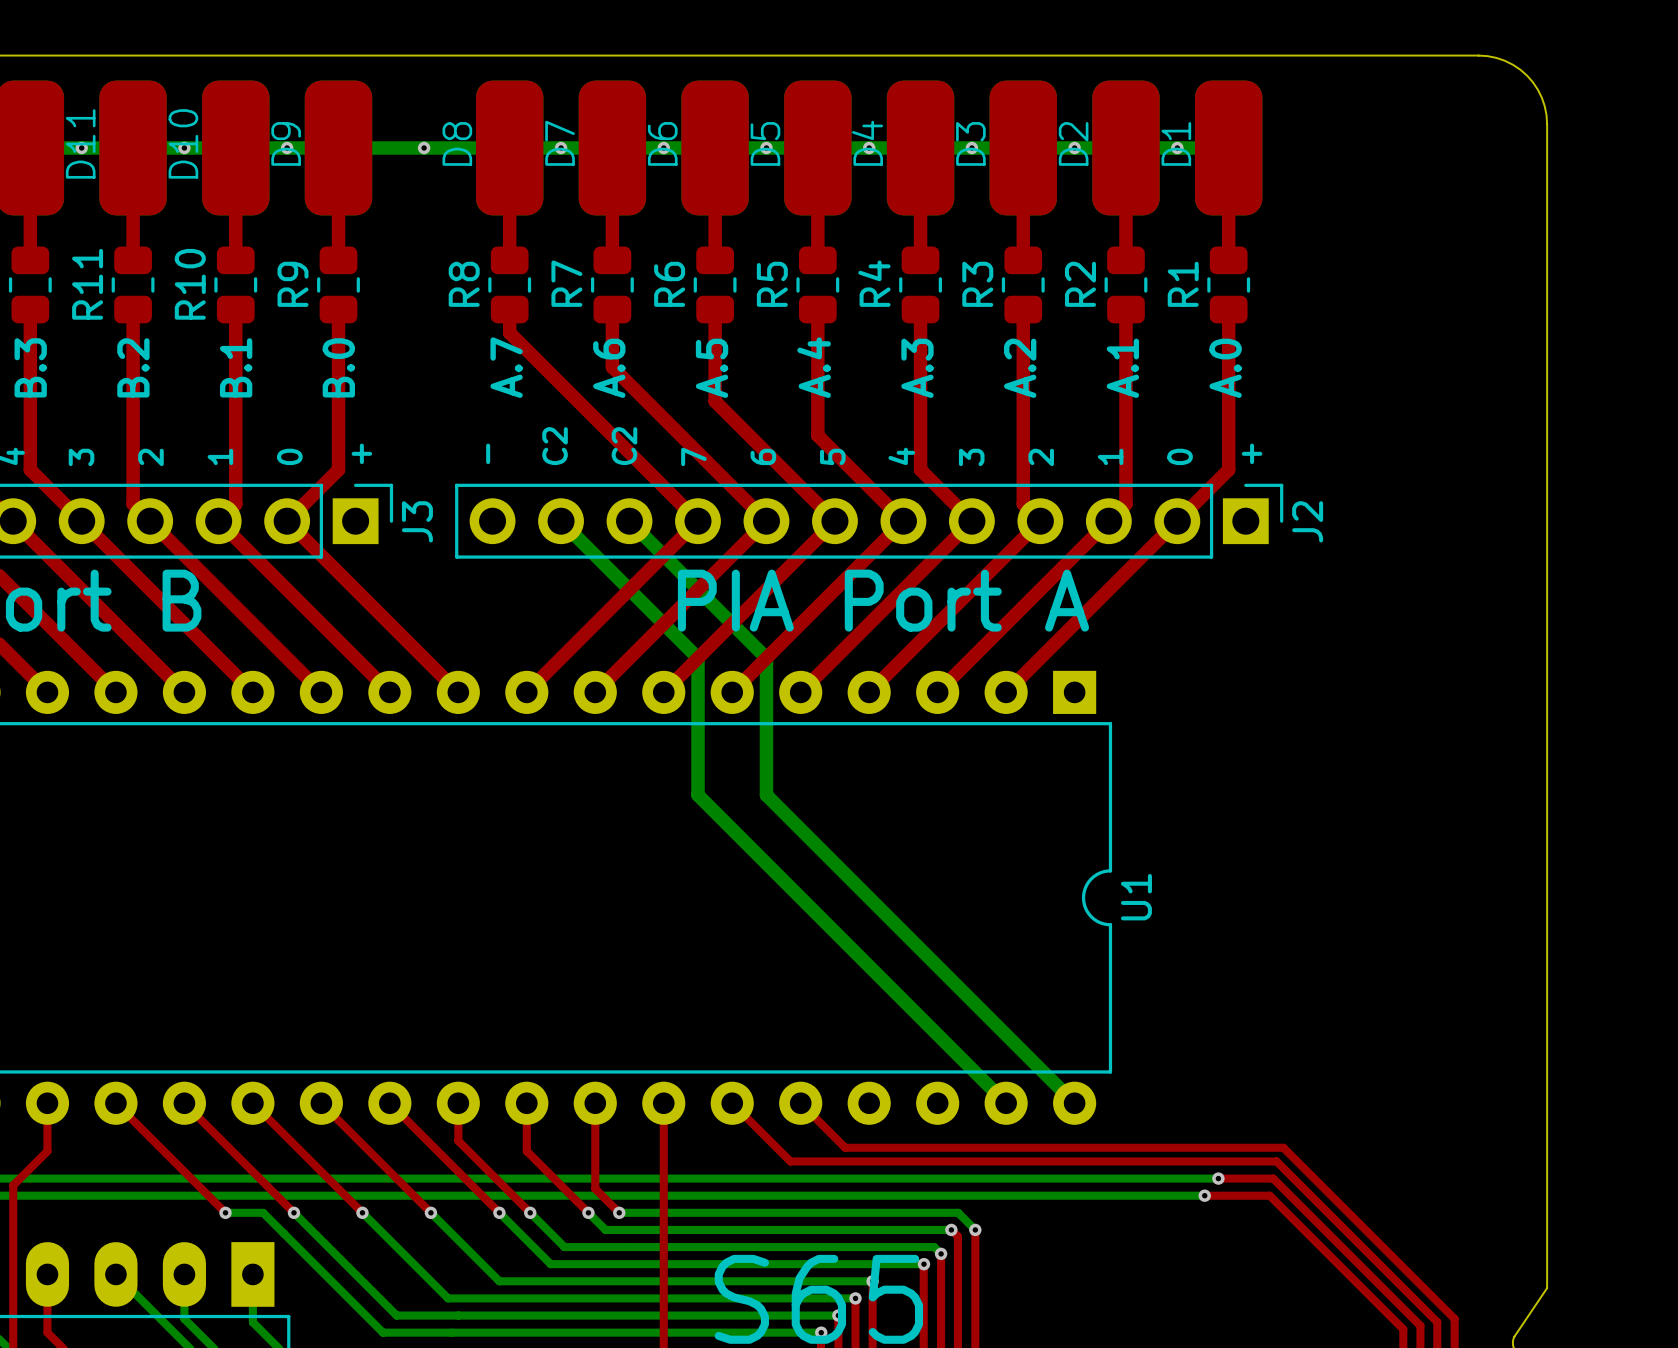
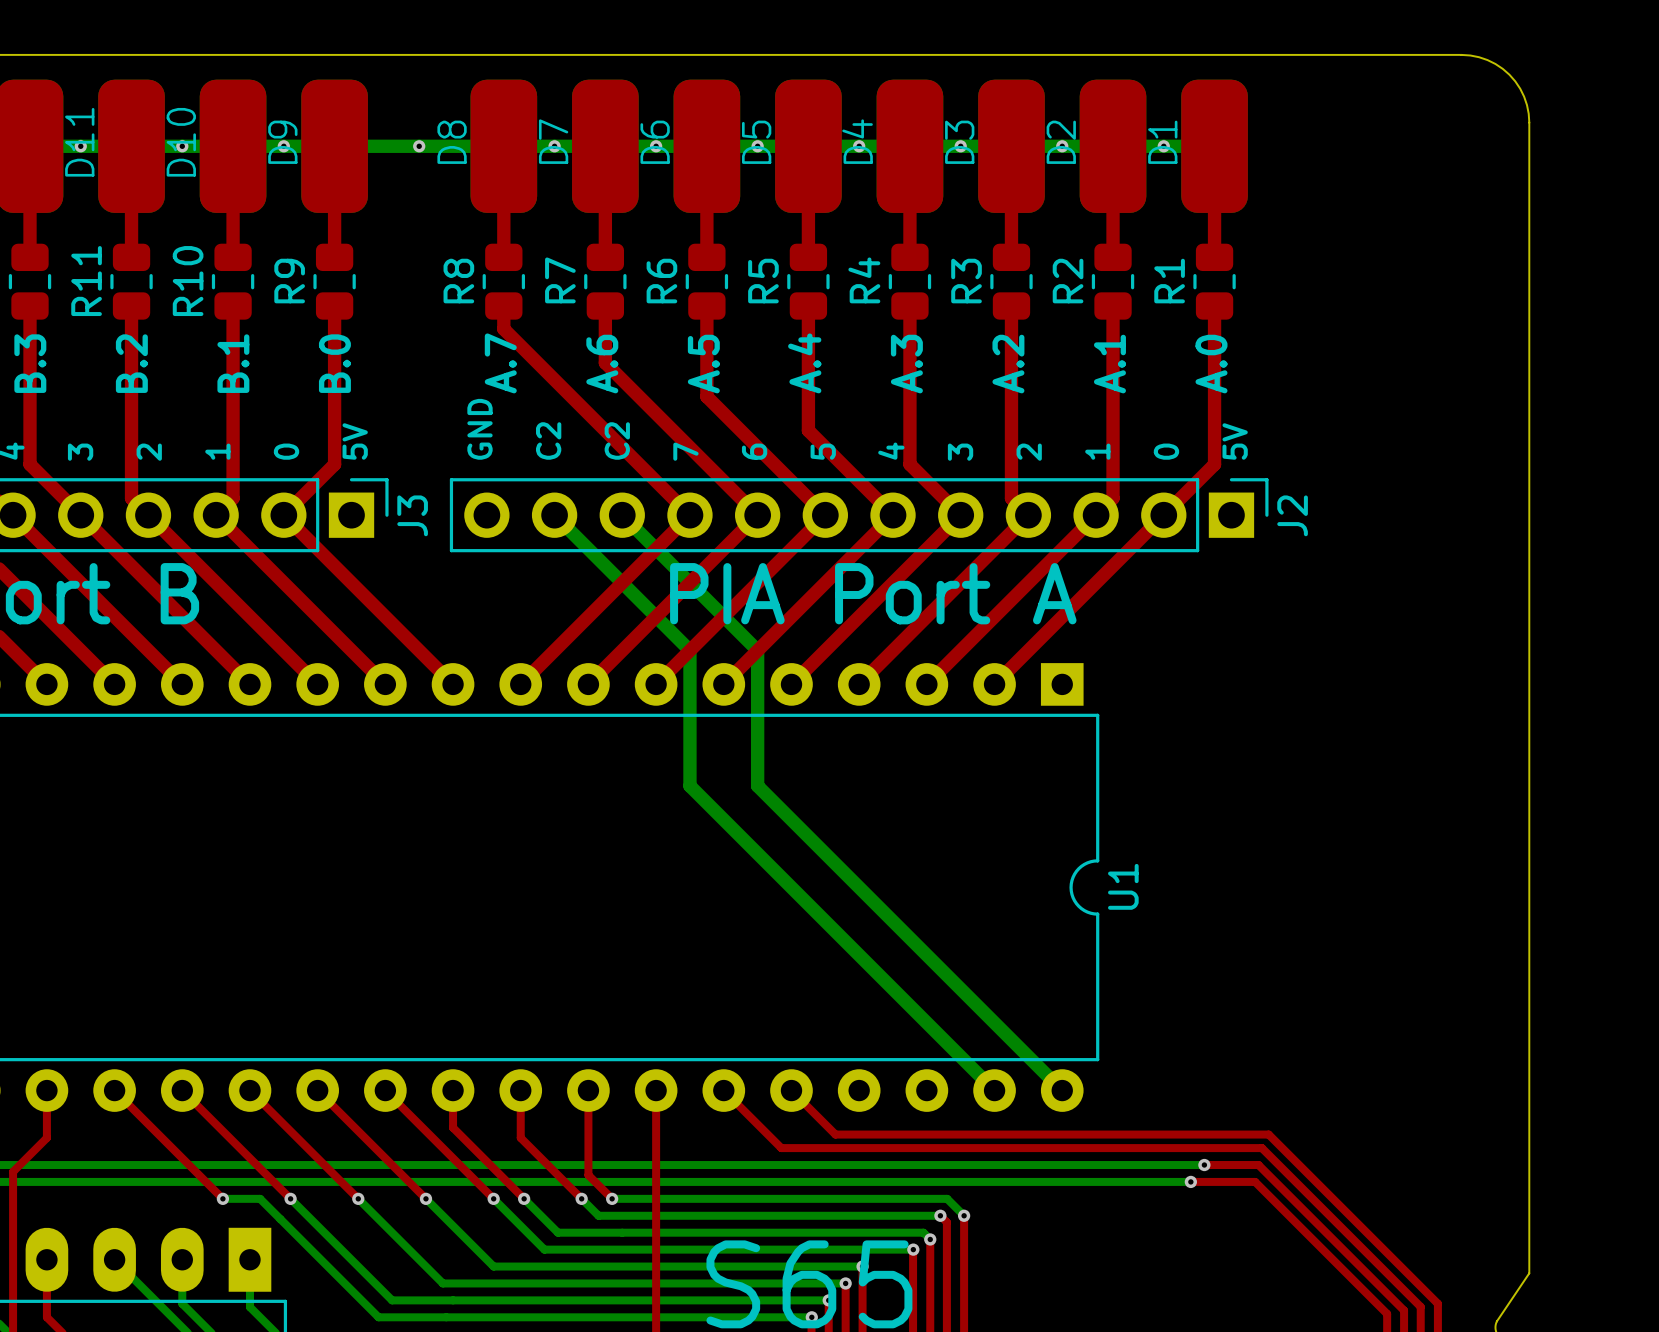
text: + (361, 453) -> 5V (355, 441)
text: - (488, 453) -> GND (480, 429)
text: + (1252, 453) -> 5V (1235, 441)

